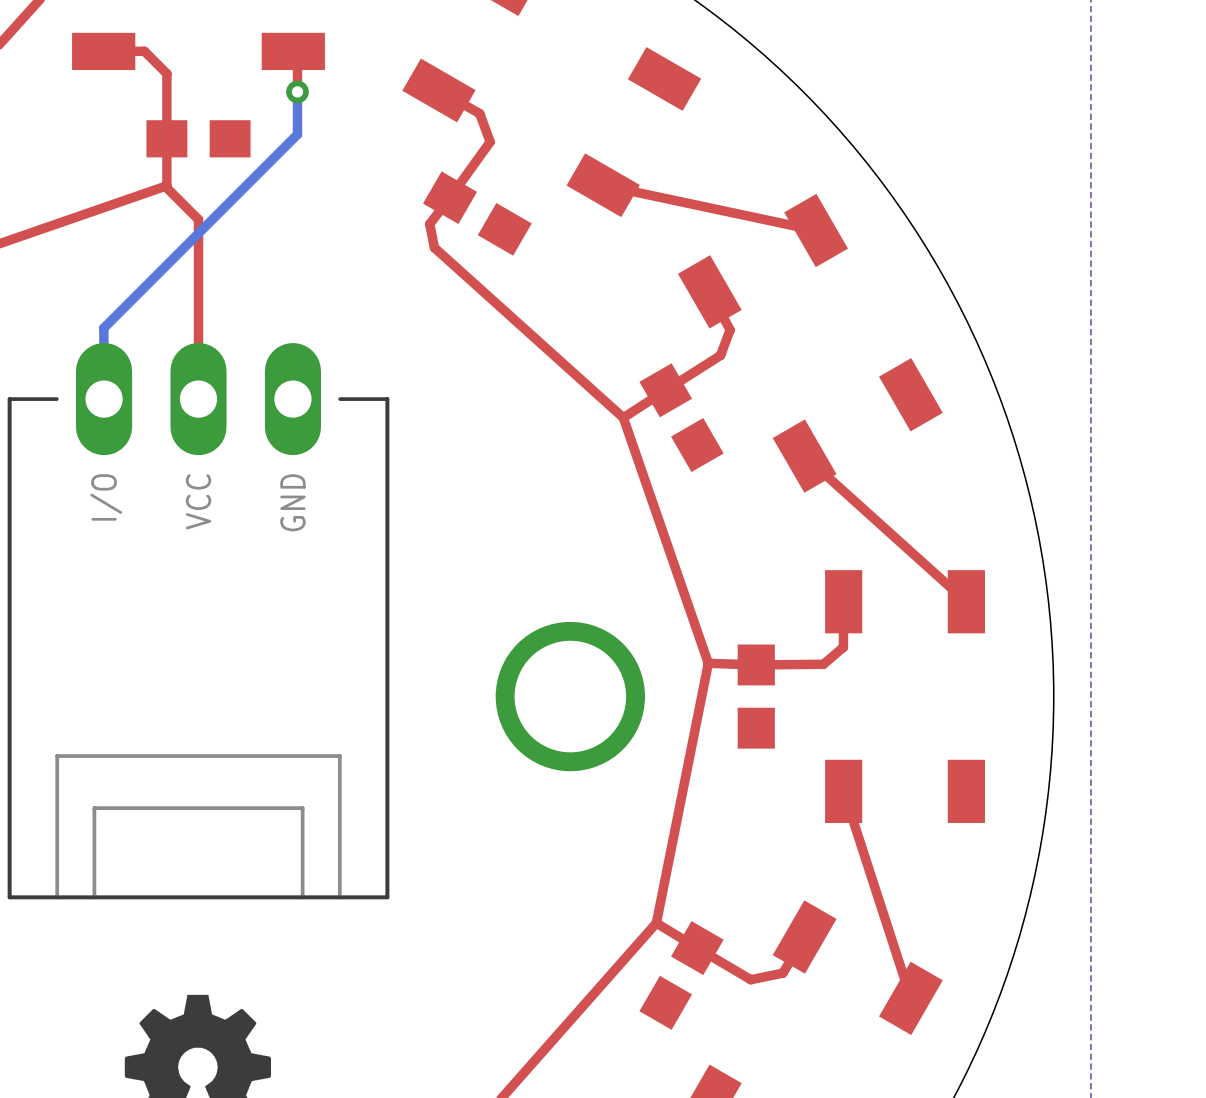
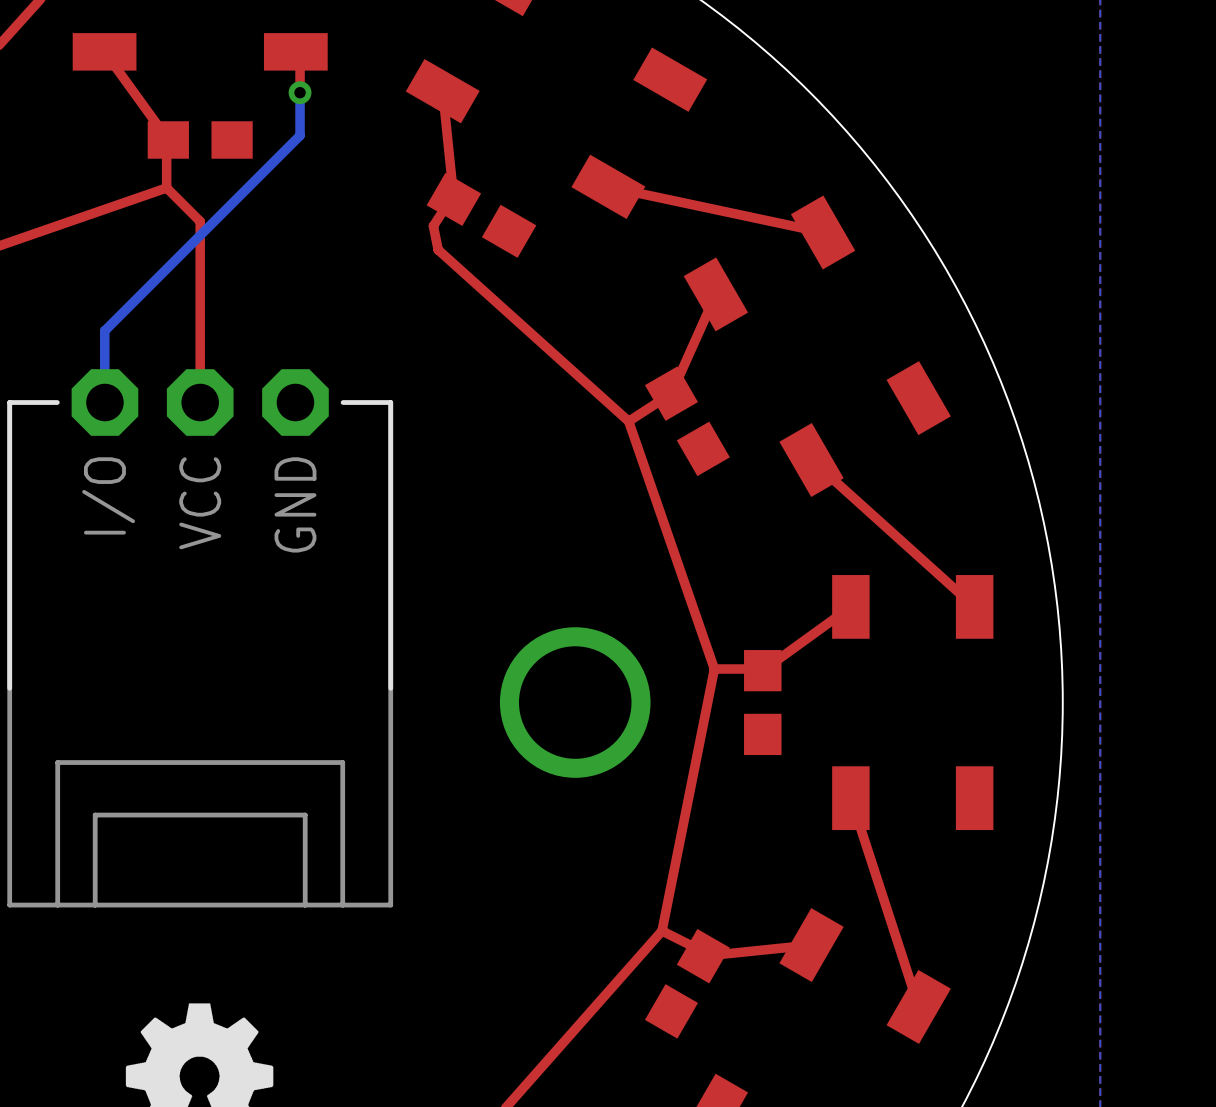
top track: (103, 51) (144, 51) (166, 73) (166, 186) (165, 186) -> (104, 51) (168, 139) (166, 187)
top track: (438, 90) (479, 113) (490, 141) (429, 224) -> (442, 91) (453, 199) (450, 199) (433, 226)
top track: (709, 291) (730, 329) (720, 355) (665, 390) -> (715, 294) (671, 393)
part footprint: [7, 343, 390, 900] -> [7, 369, 394, 908]
top track: (843, 601) (843, 647) (823, 664) (708, 663) -> (850, 606) (762, 670) (714, 669)
top track: (656, 923) (750, 979) (782, 973) (804, 937) -> (662, 930) (690, 945) (703, 956) (811, 945)

